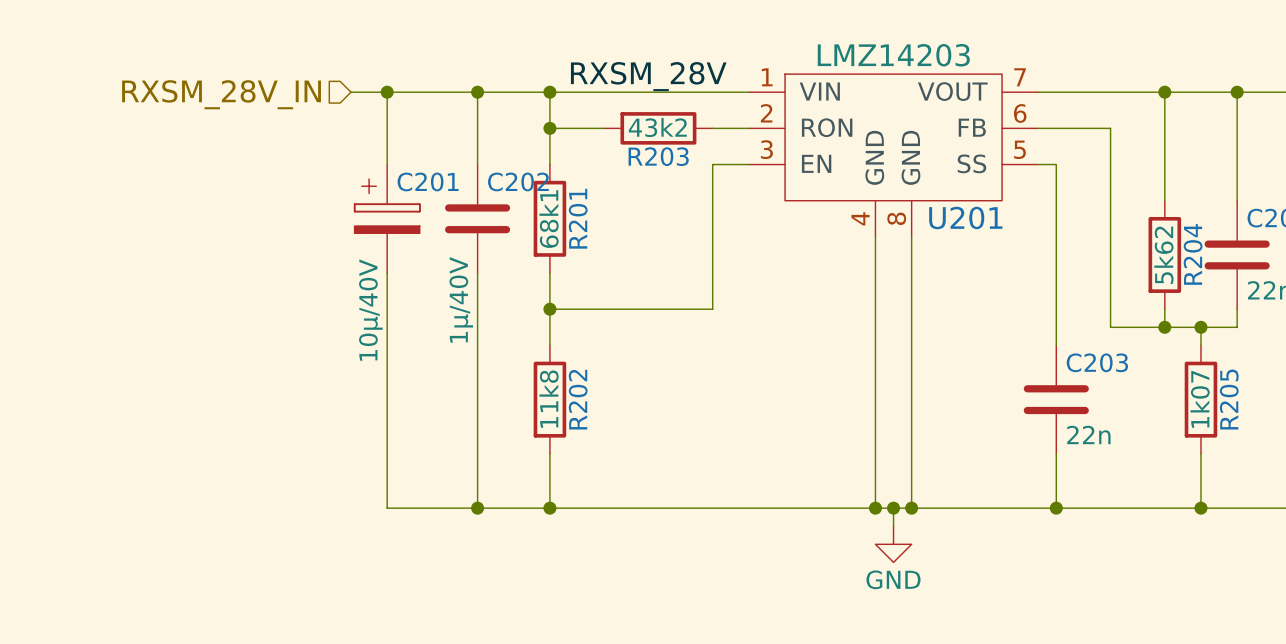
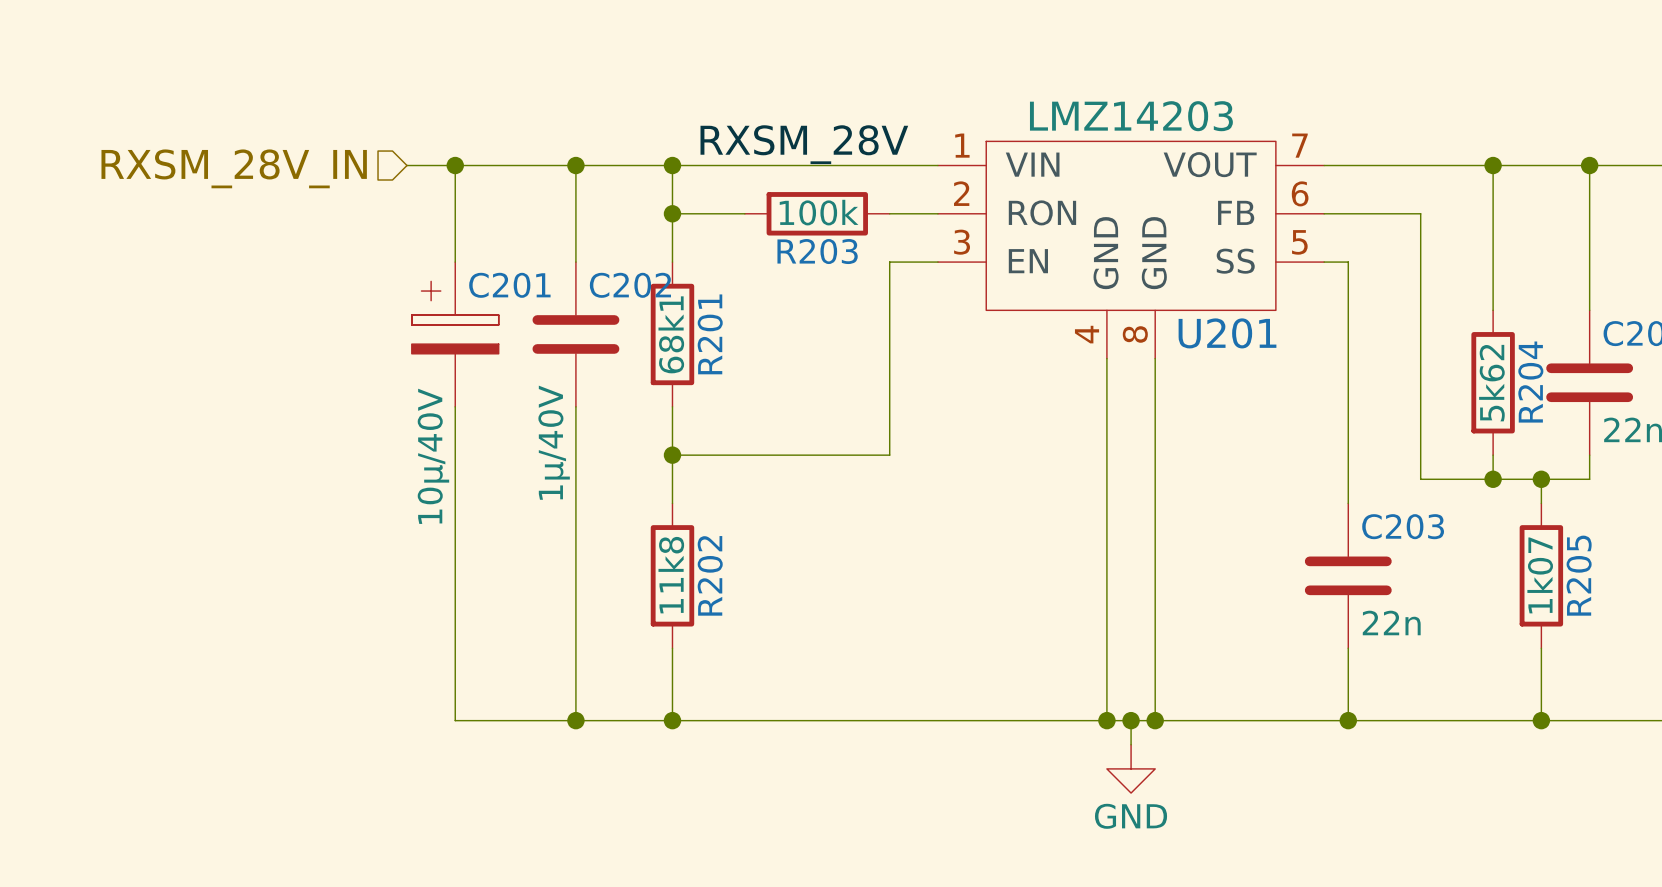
R203 value: 43k2 (657, 127) -> 100k (819, 212)

